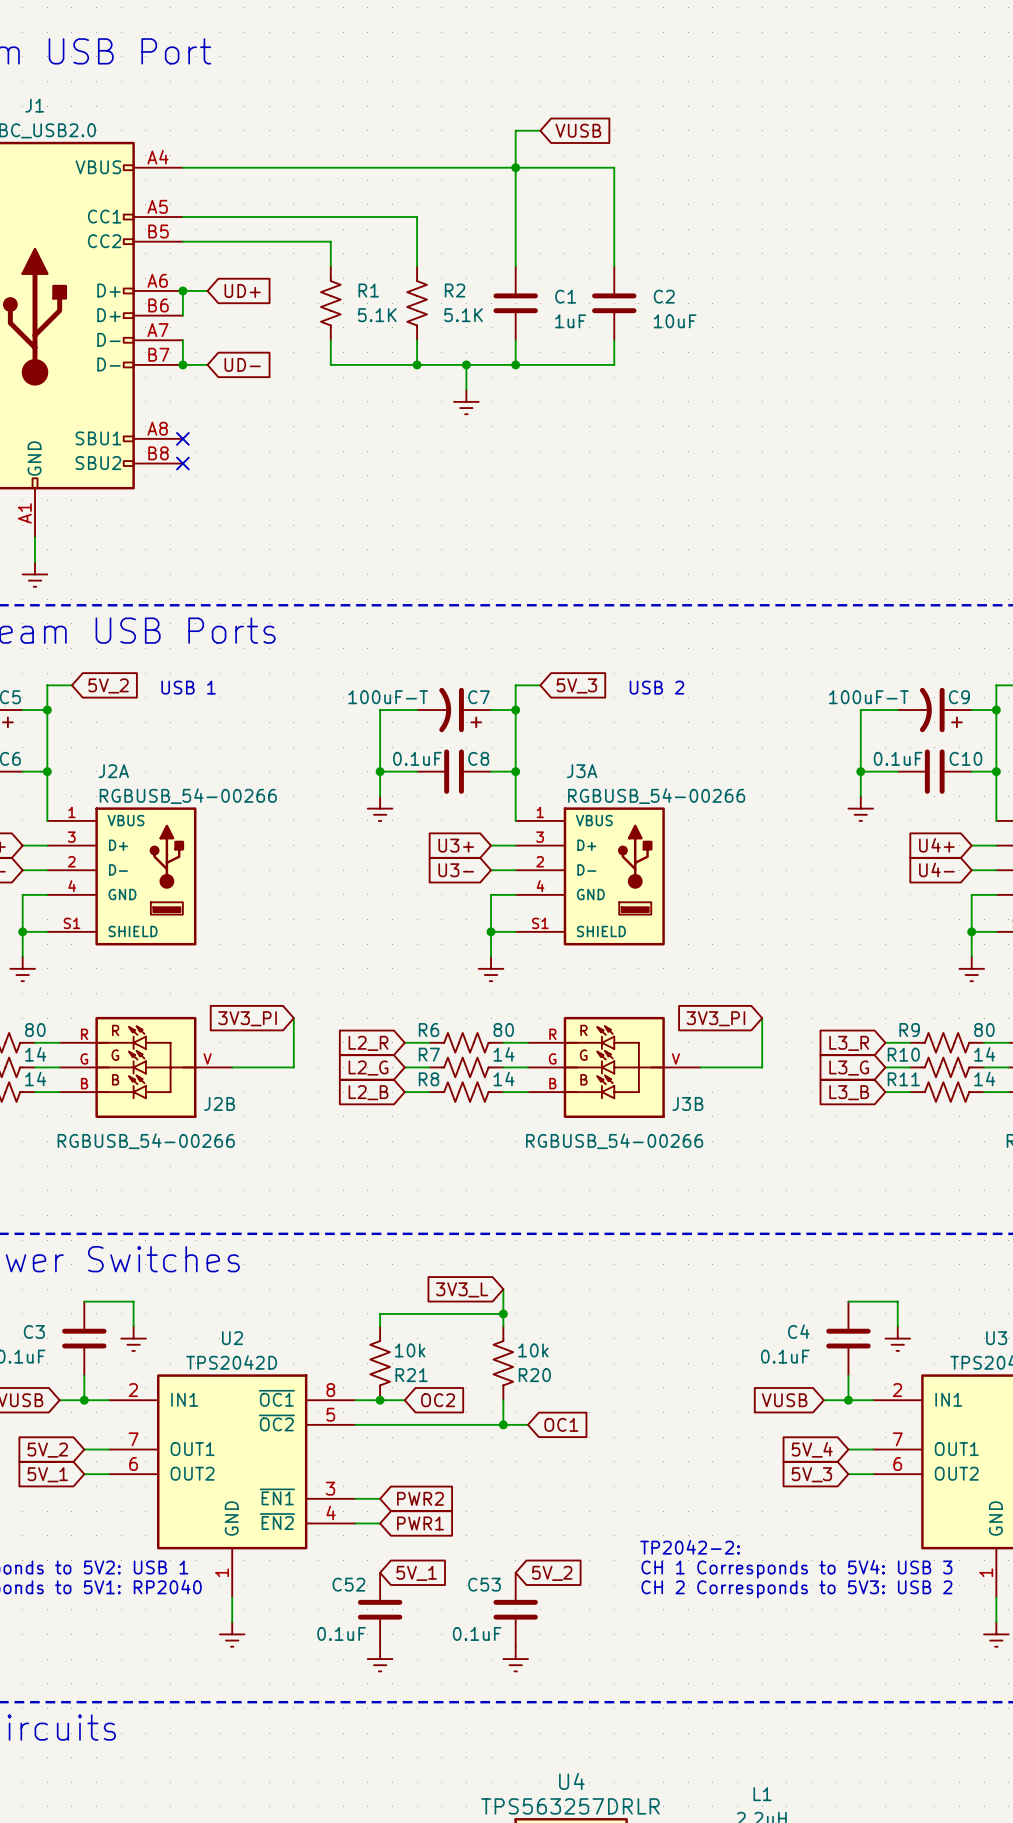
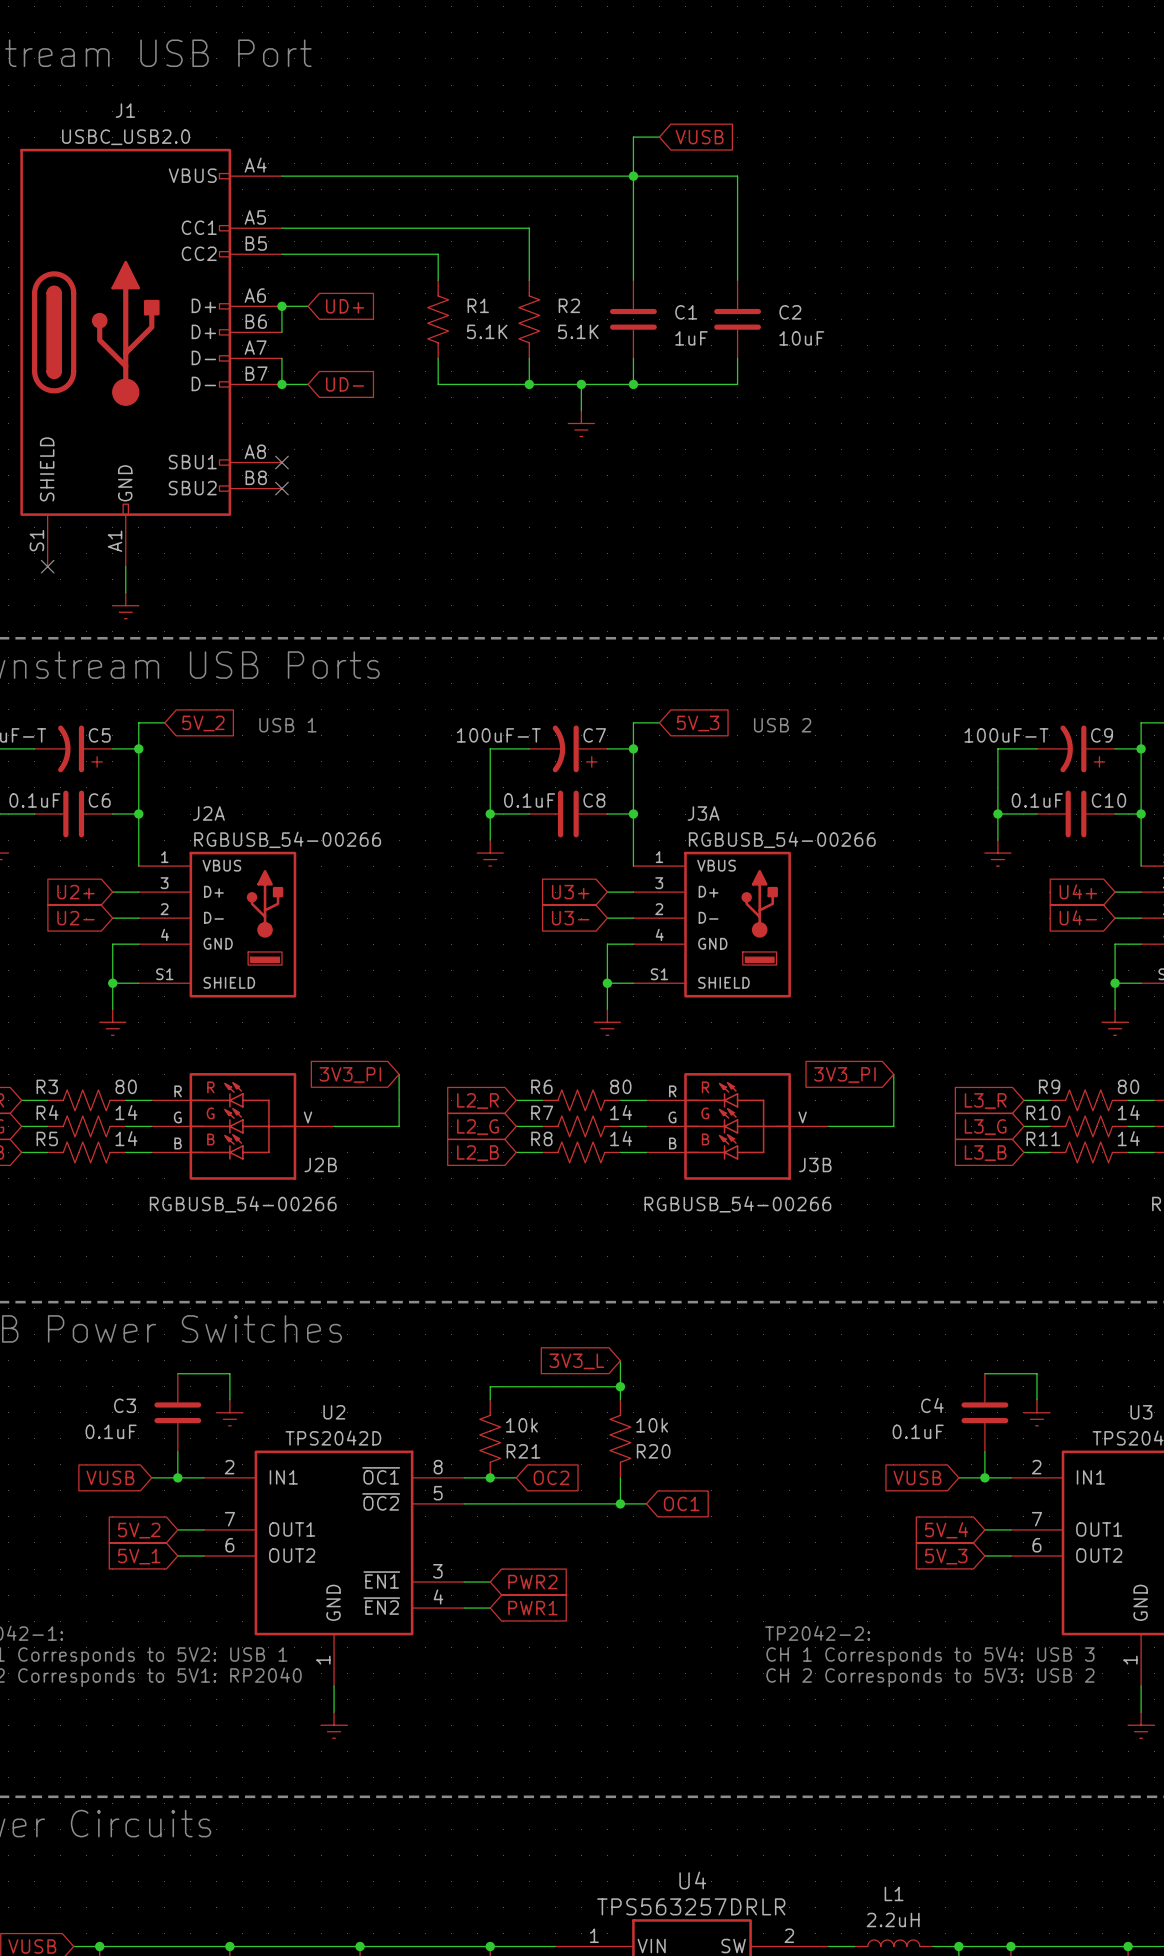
global label: 5V_1 (416, 1573) -> none
global label: 5V_2 (552, 1573) -> none
C52: 0.1uF (380, 1609) -> none
C53: 0.1uF (515, 1609) -> none
power symbol: (380, 1659) -> none
power symbol: (515, 1659) -> none

